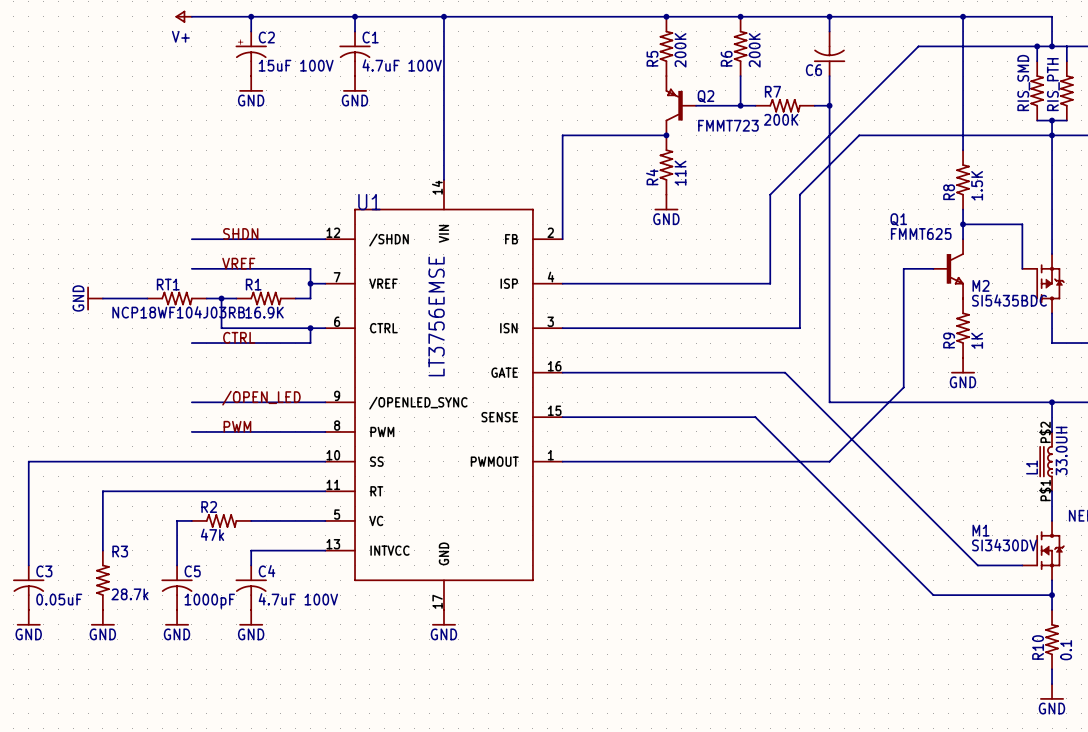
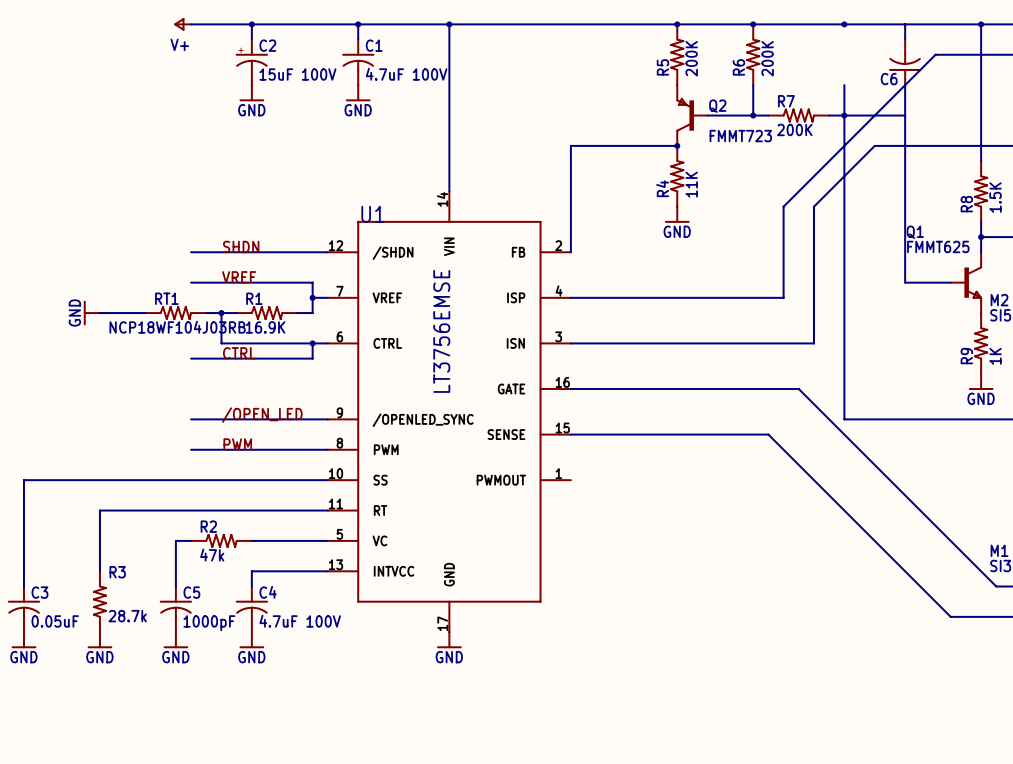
wire: (829, 16) (829, 31) -> (905, 24) (905, 39)
C6 position: (829, 53) -> (905, 62)
wire: none -> (844, 115) (905, 115)
wire: (903, 268) (903, 387) (829, 461) (562, 461) -> (920, 282) (905, 282) (905, 85)

